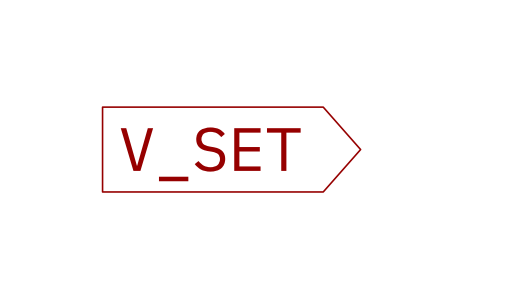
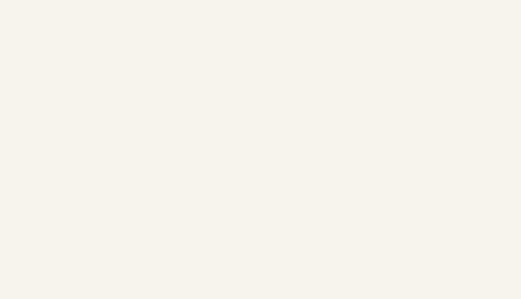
global label: V_SET (210, 154) -> none

